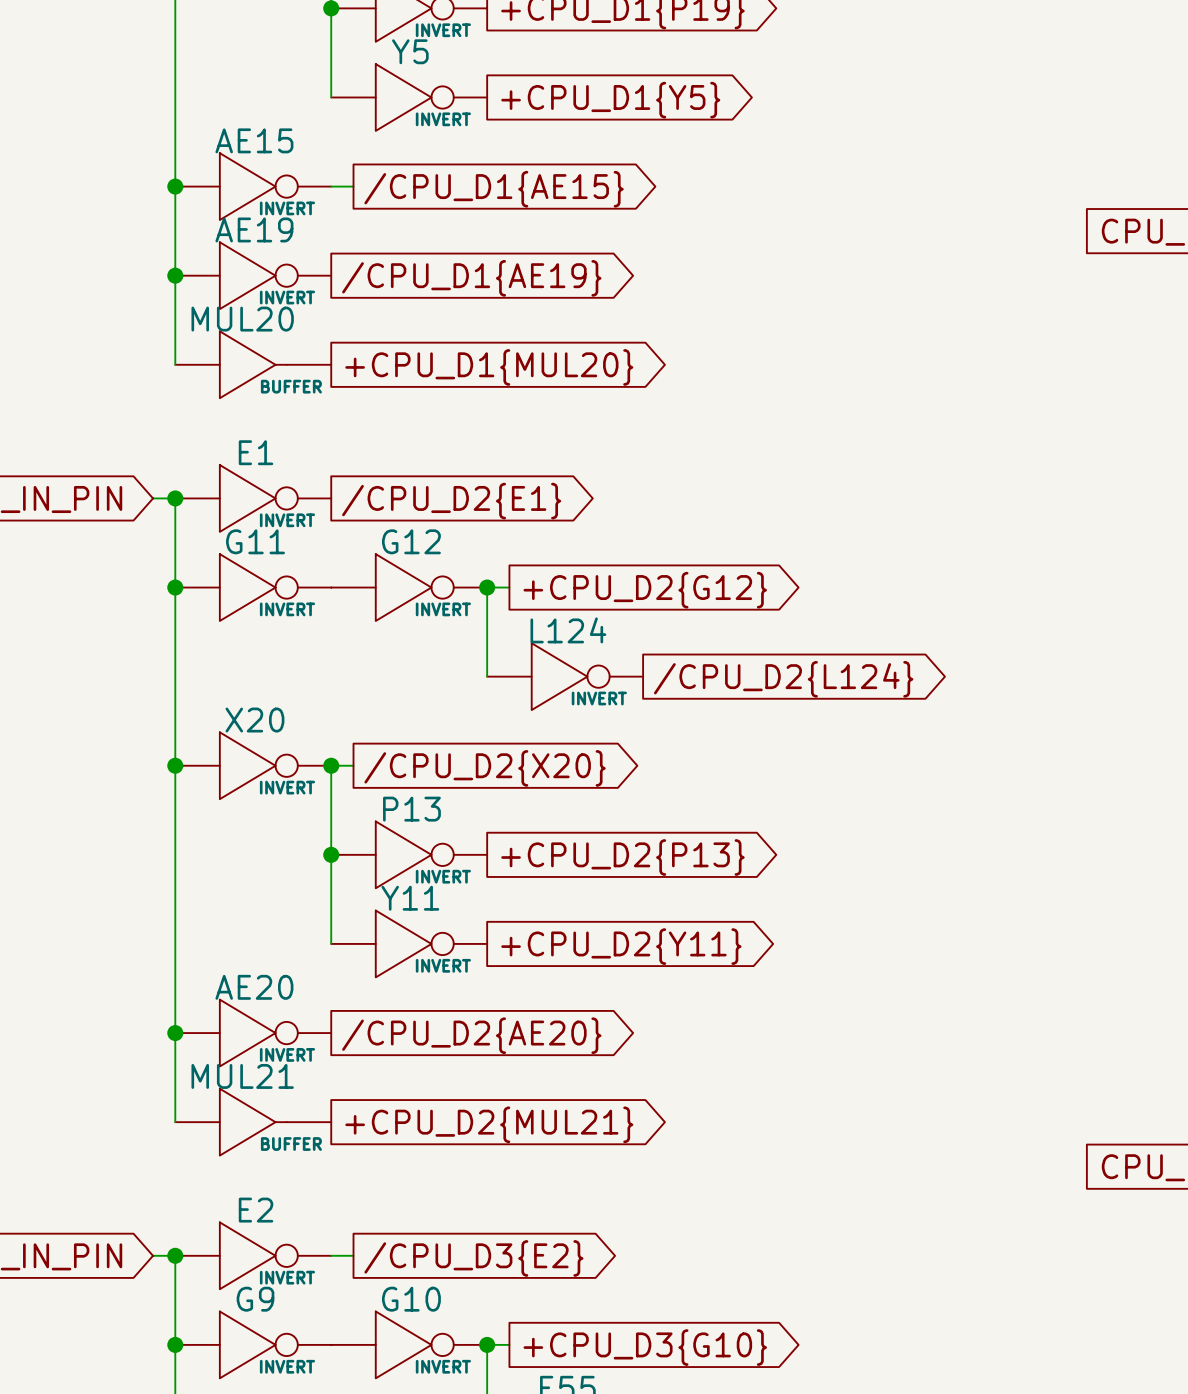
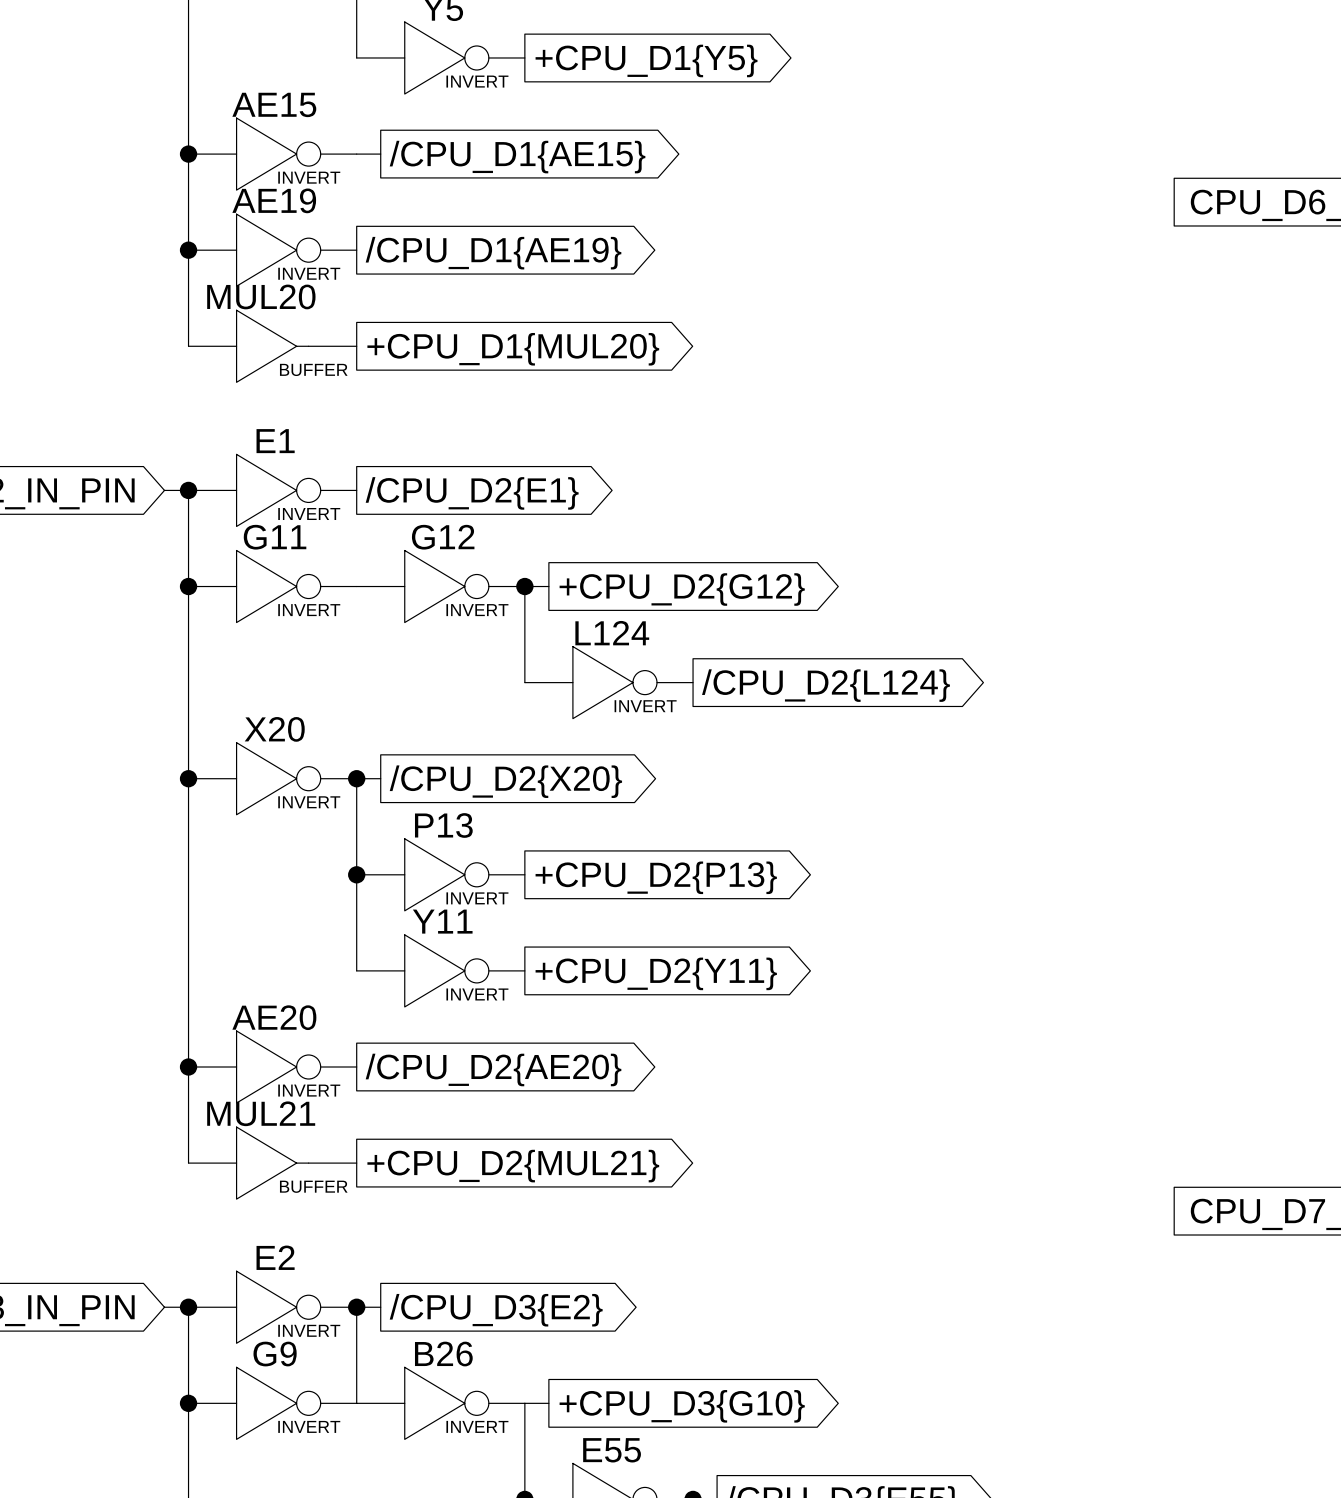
wire: none -> (356, 1307) (356, 1403)
junction: none -> (356, 1307)
G10 name: G10 (411, 1299) -> B26 (443, 1354)
junction: (487, 1344) -> none

